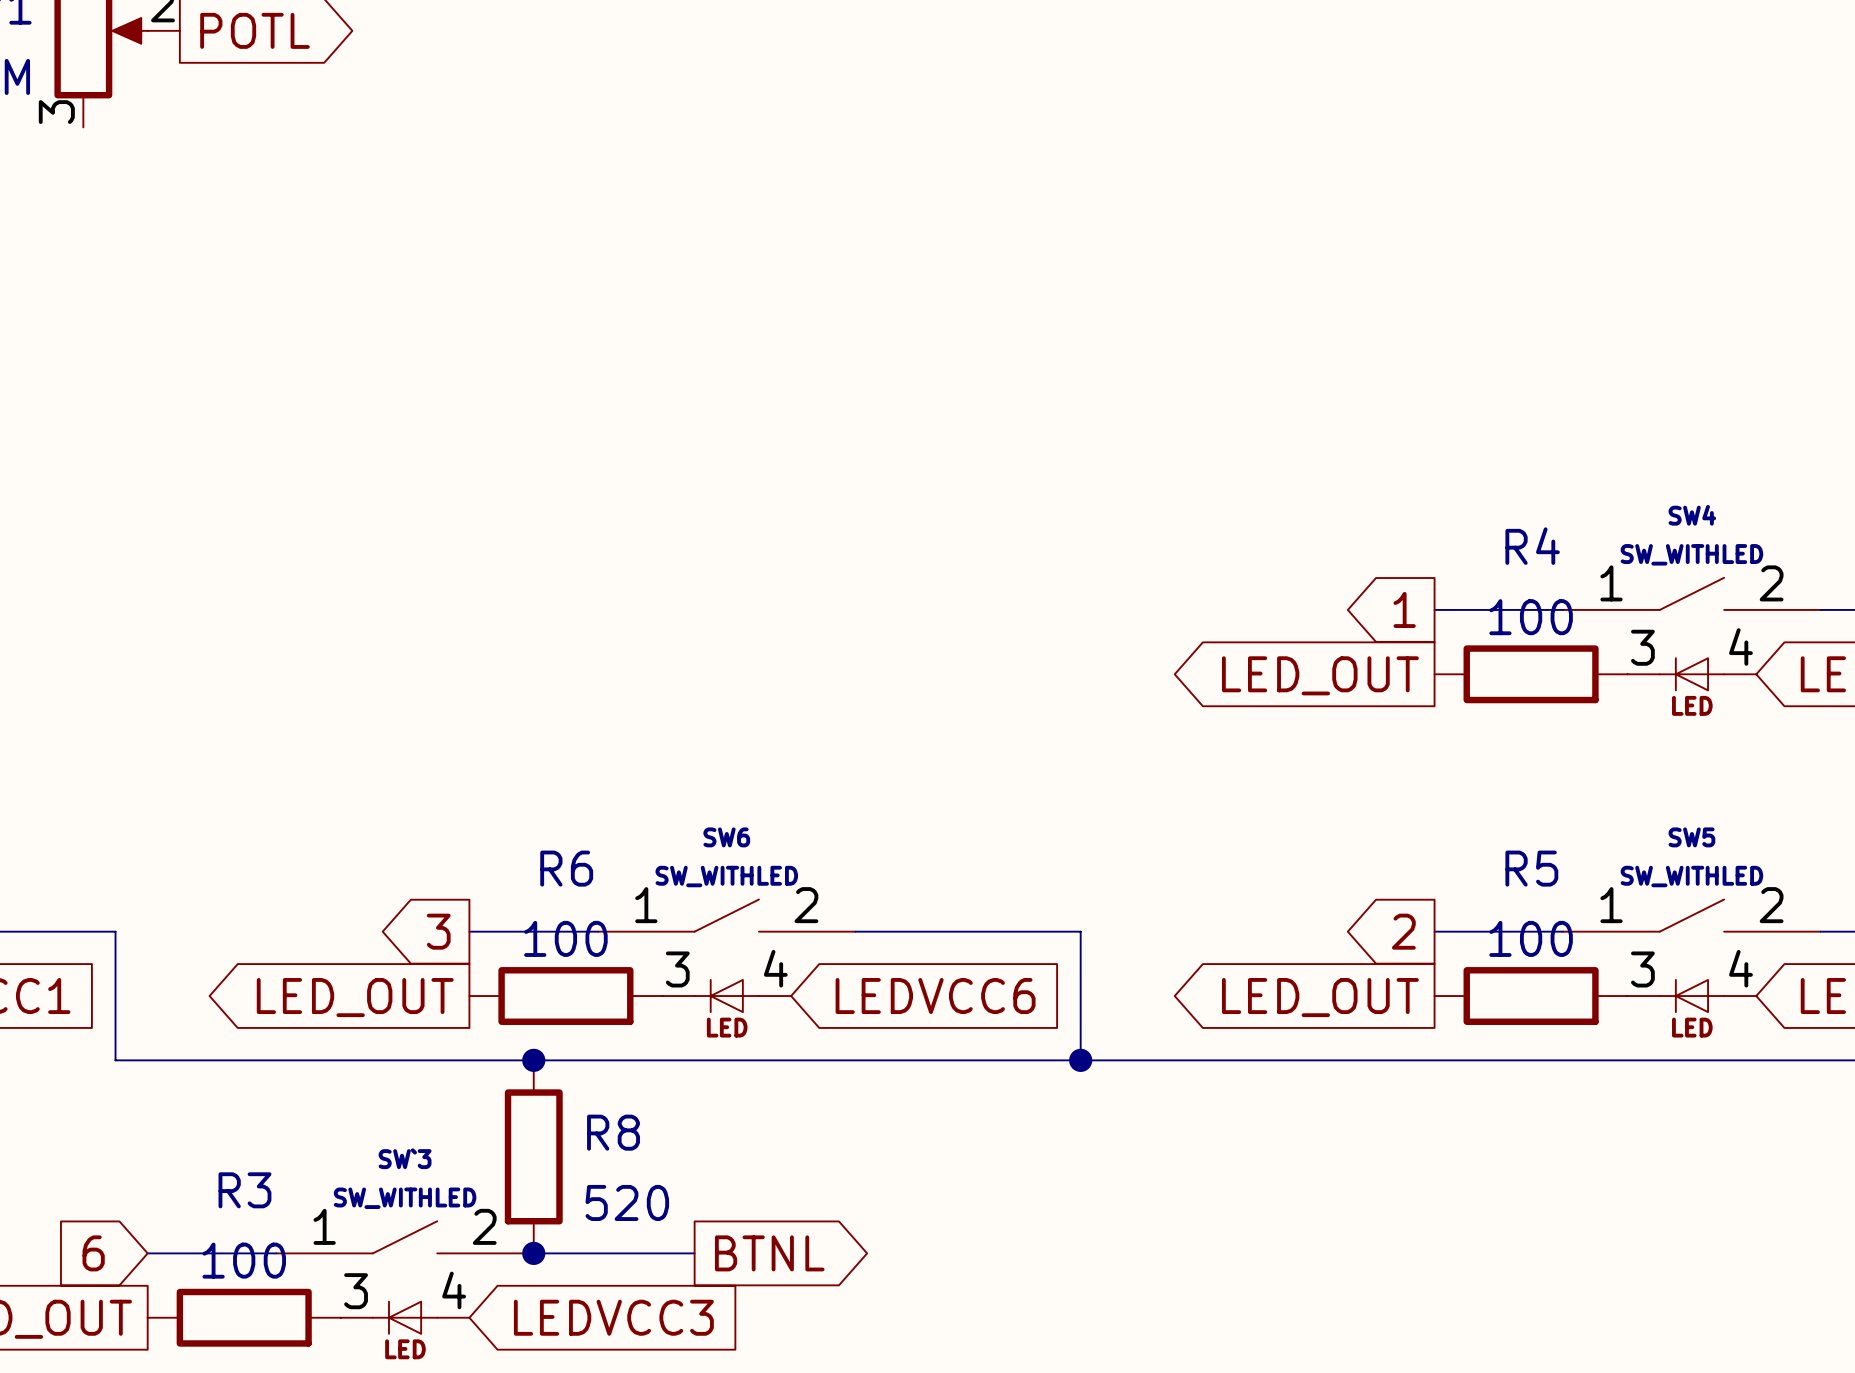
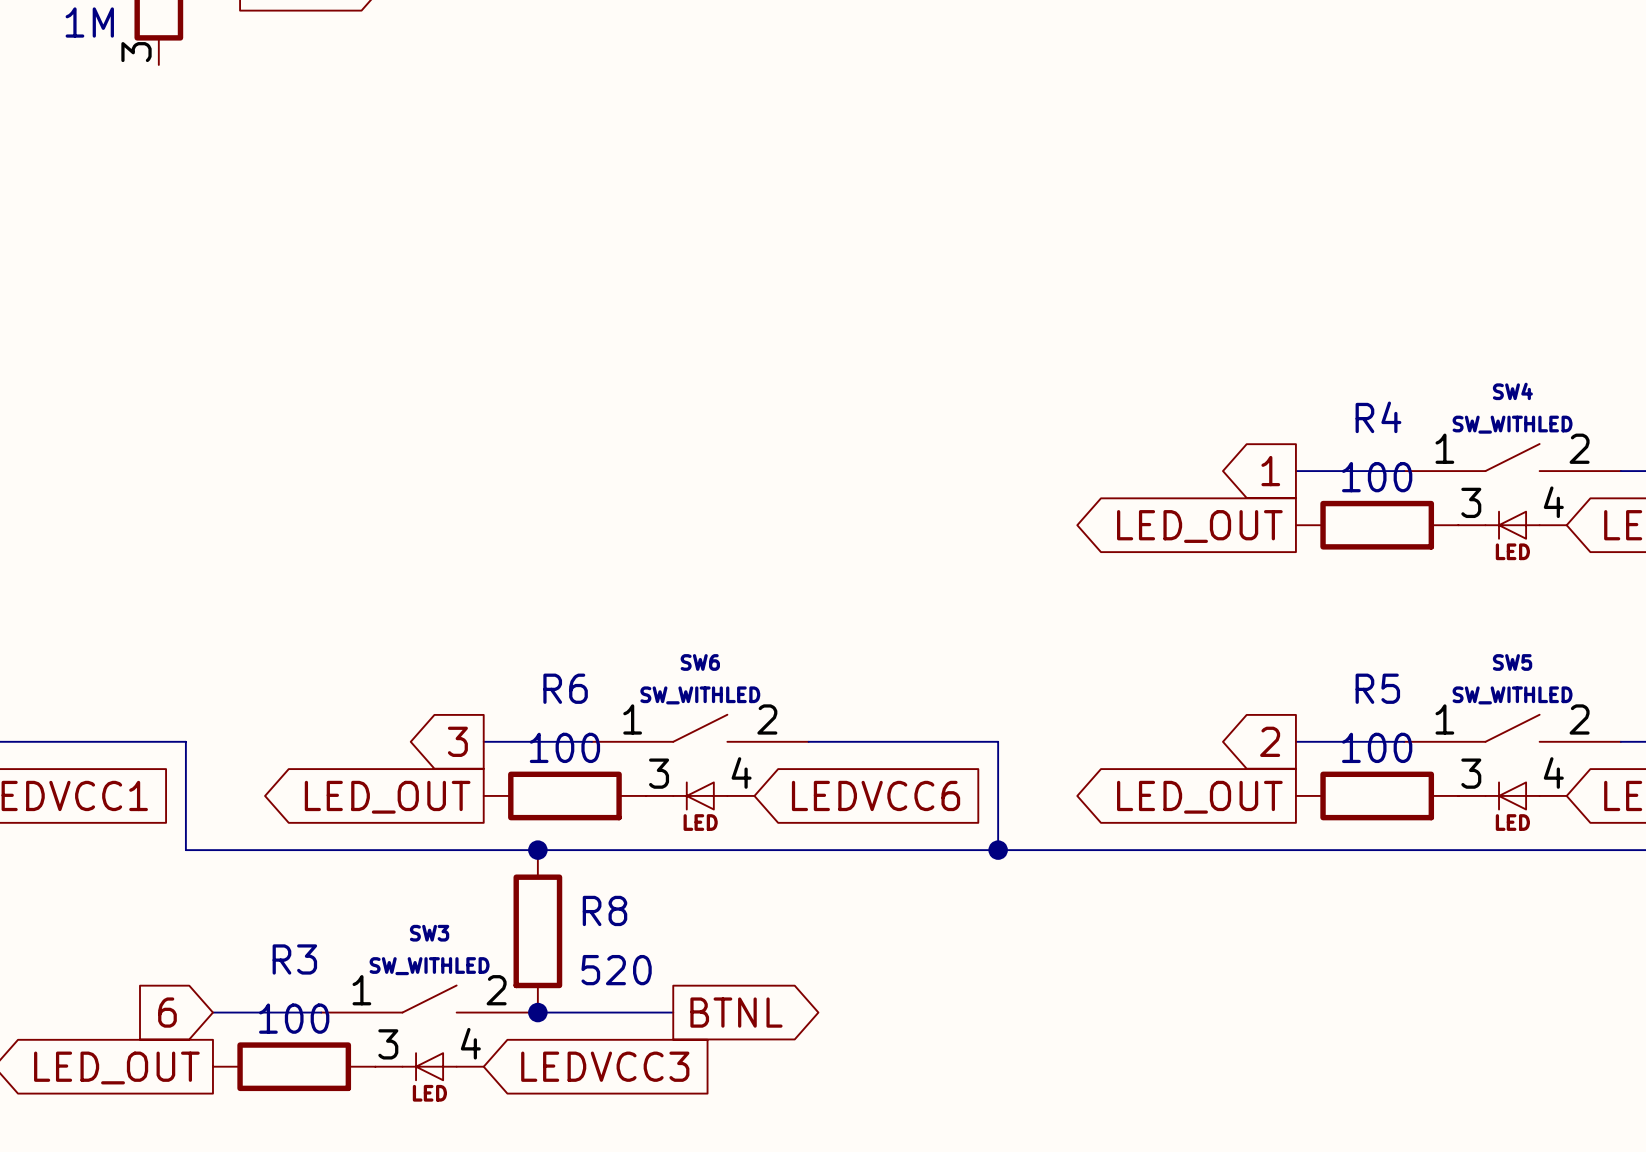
SW`3 name: SW`3 (405, 1158) -> SW3 (429, 933)

